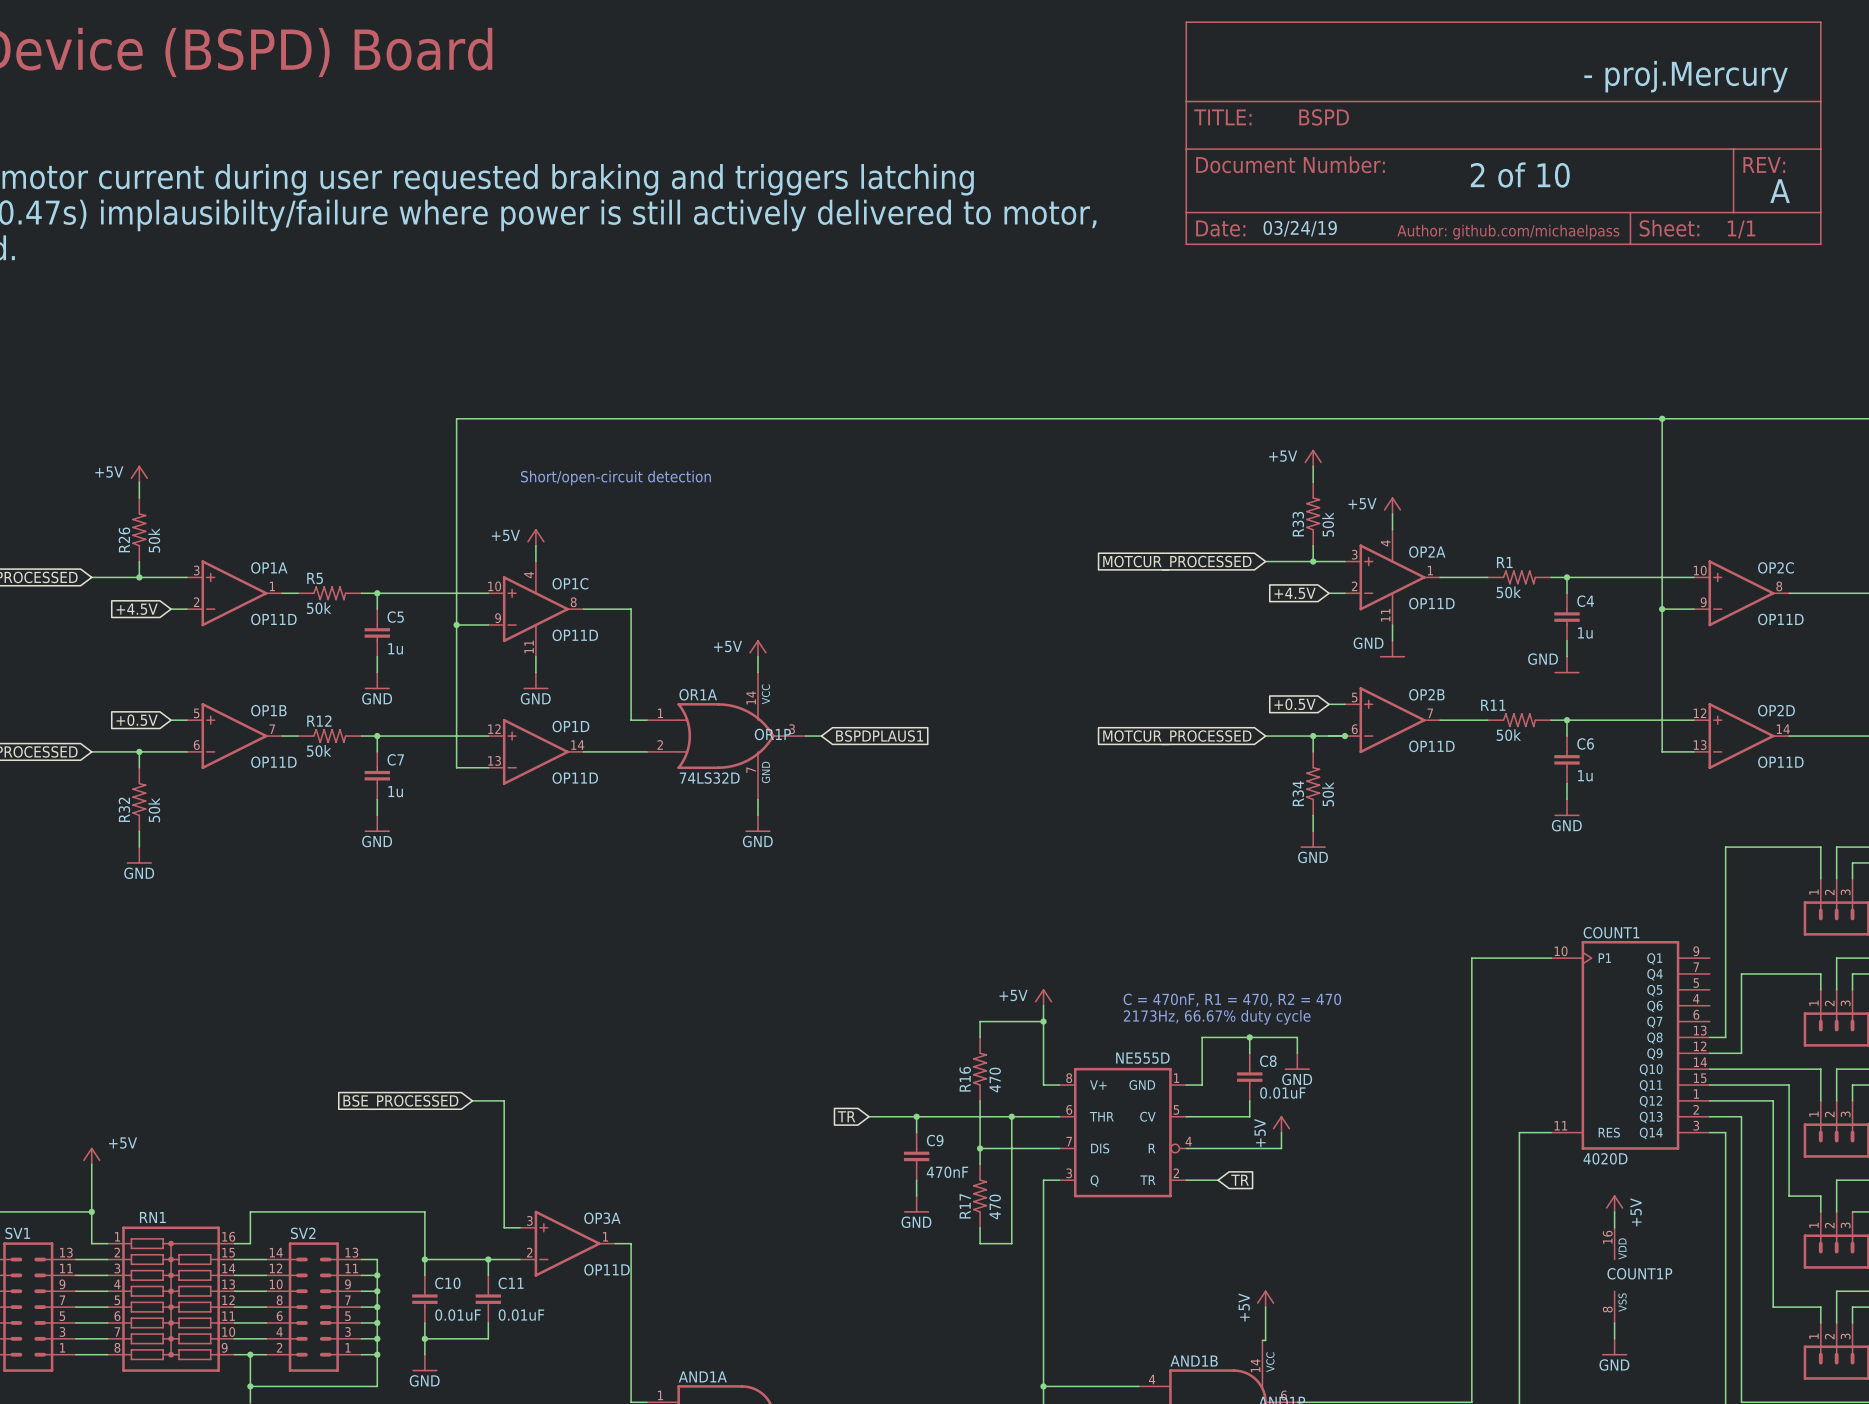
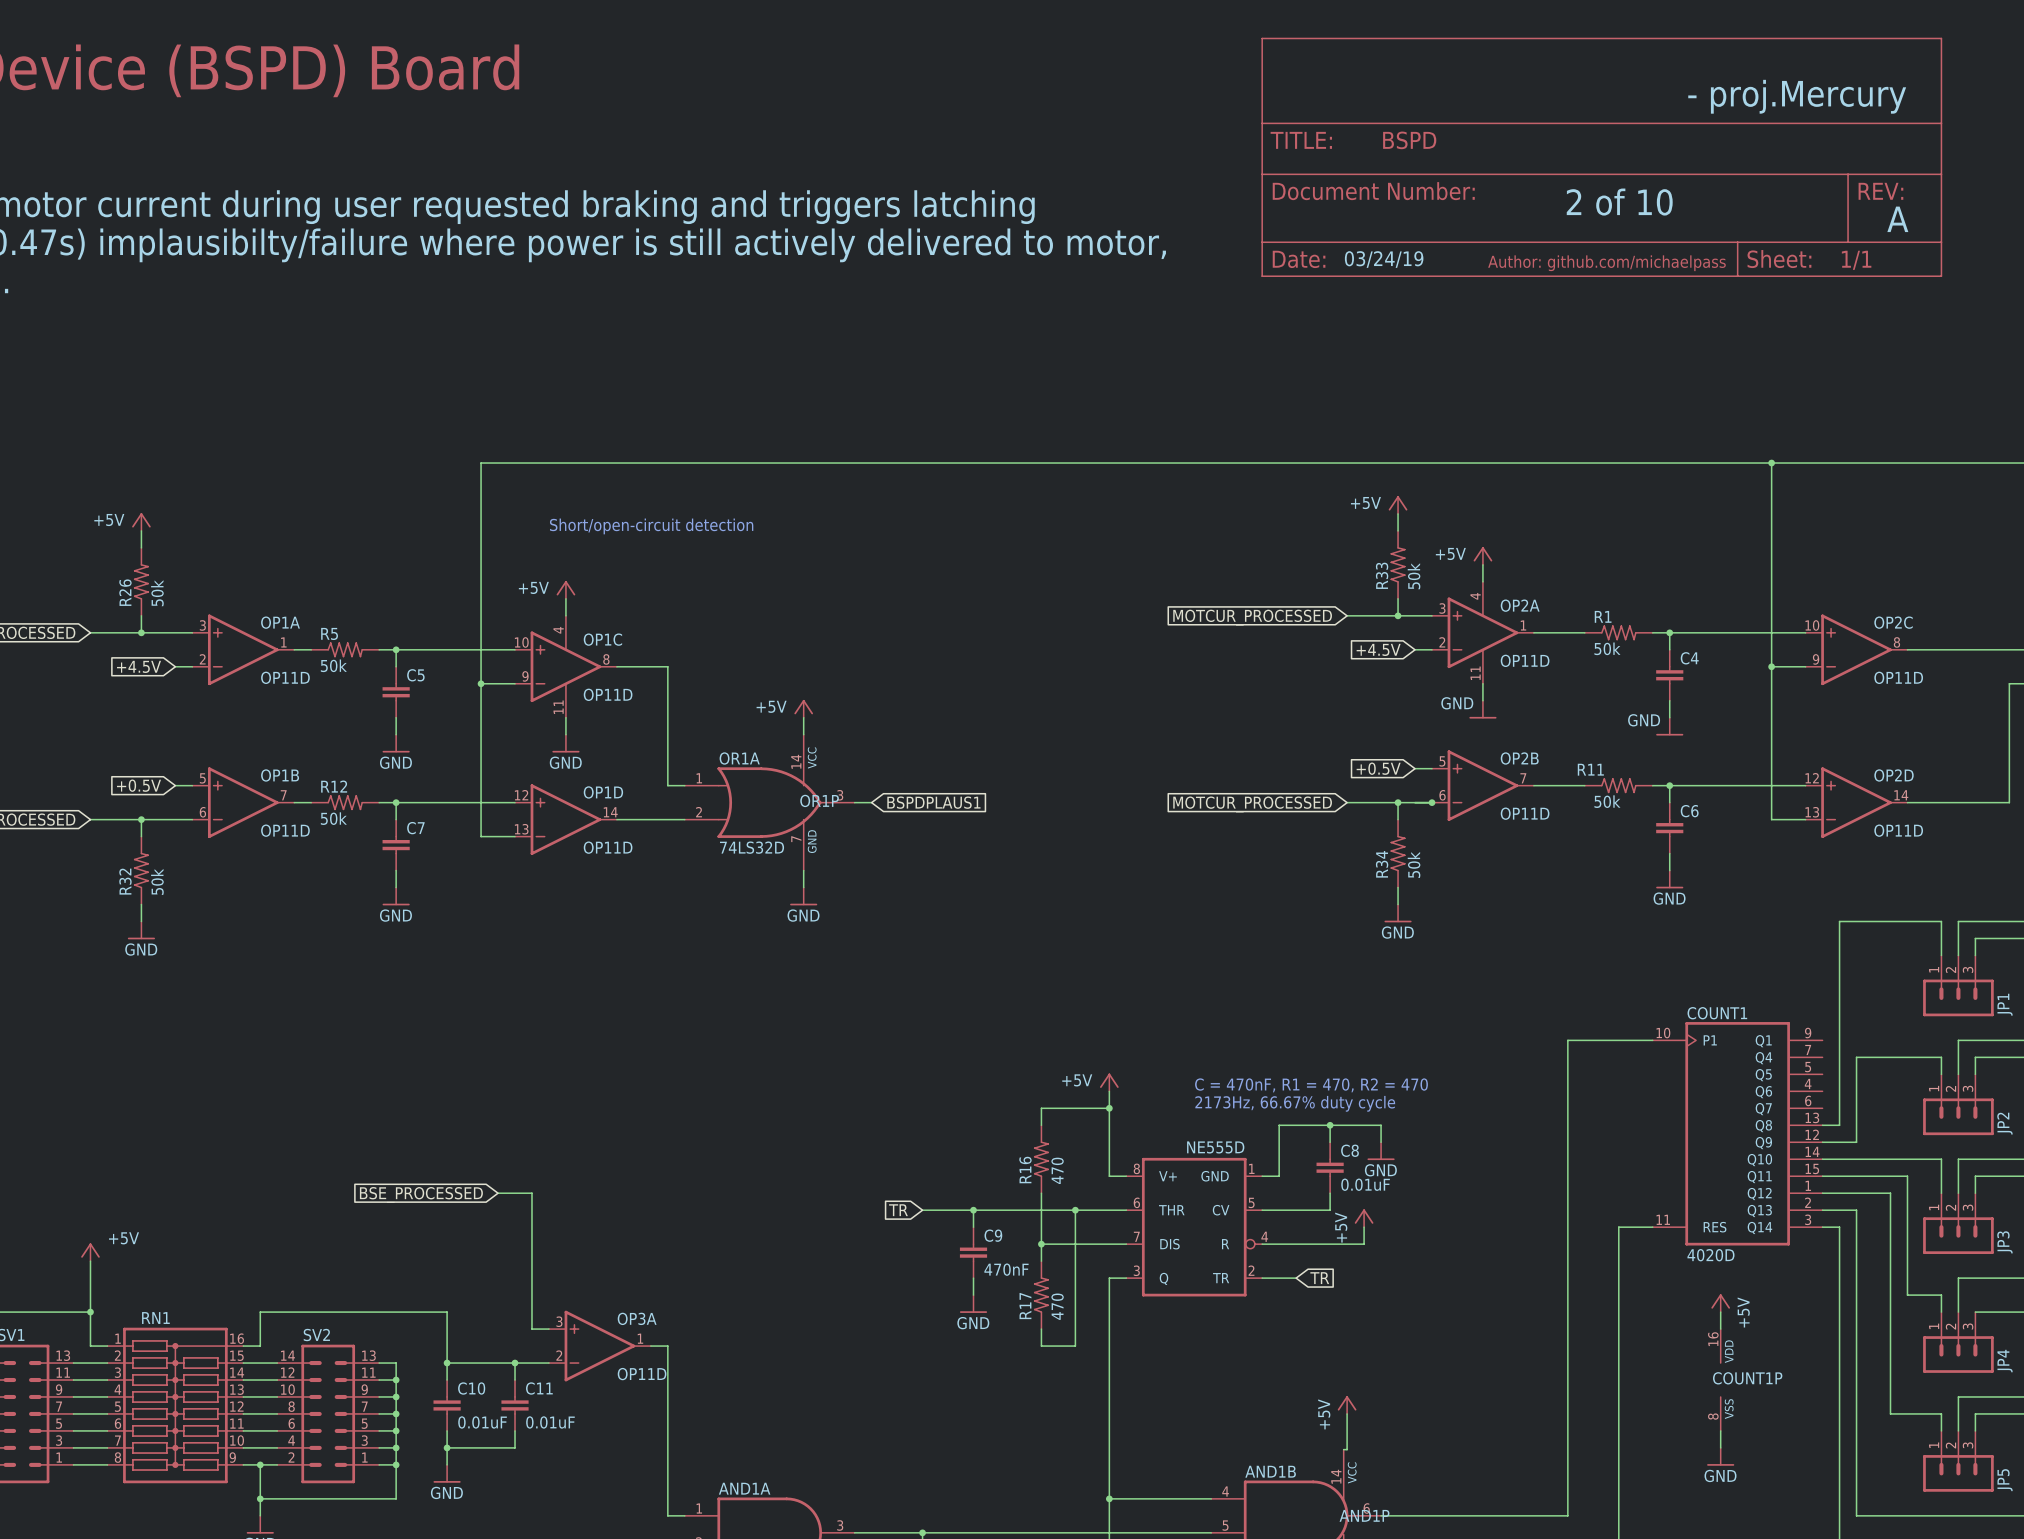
C4 value: 1u (1585, 633) -> none
C5 value: 1u (395, 648) -> none
C6 value: 1u (1585, 775) -> none
C7 value: 1u (395, 791) -> none

